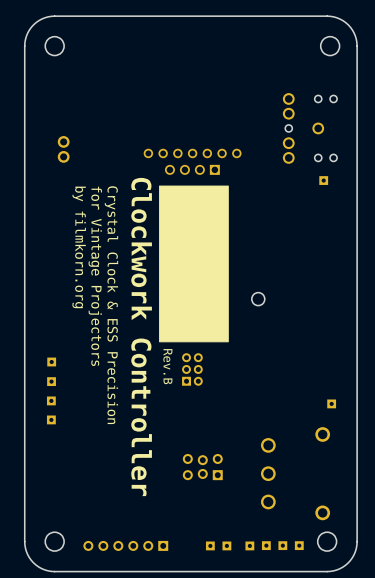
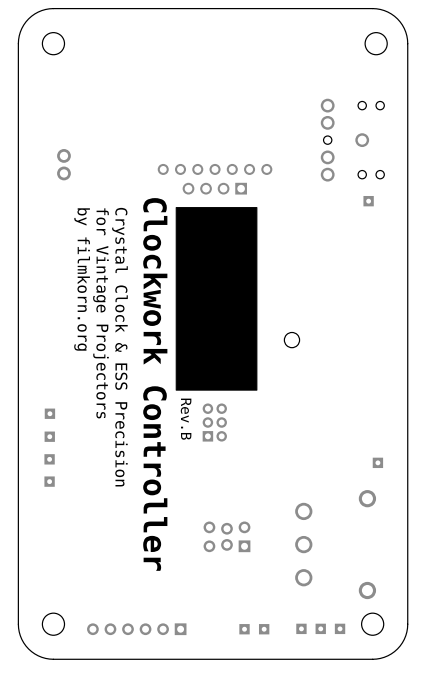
part: (210, 545) -> none
part: none -> (244, 629)
part: (226, 545) -> none
part: none -> (264, 629)
part: (249, 545) -> none

